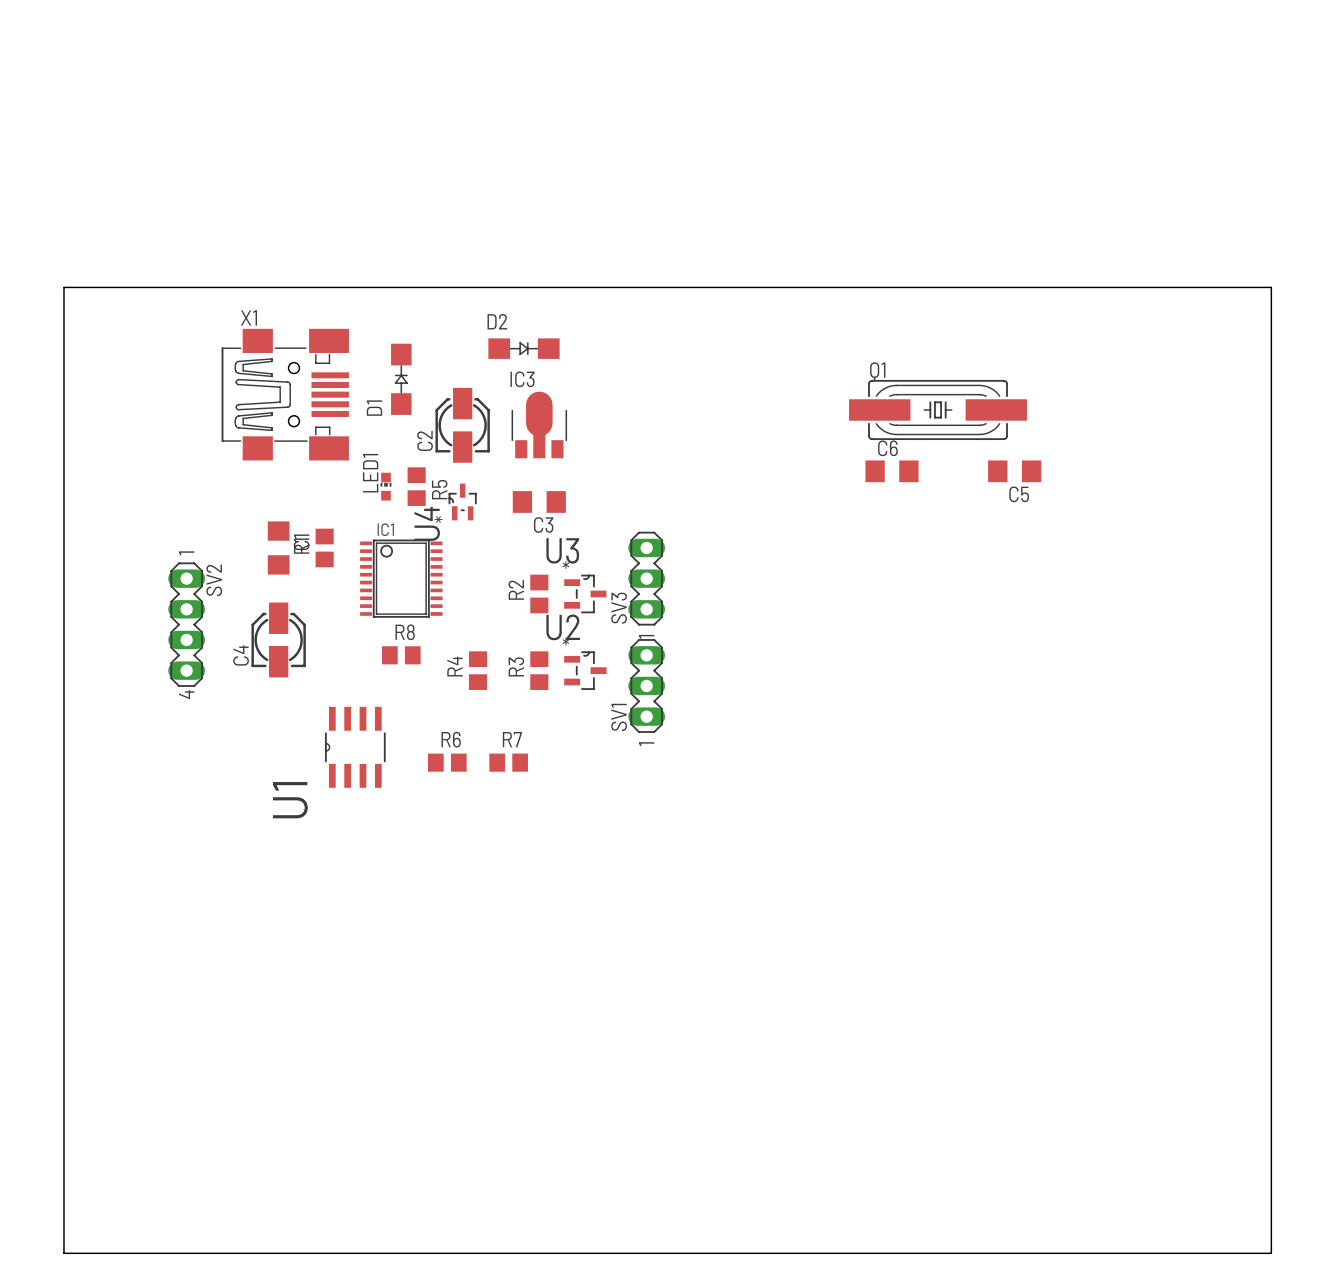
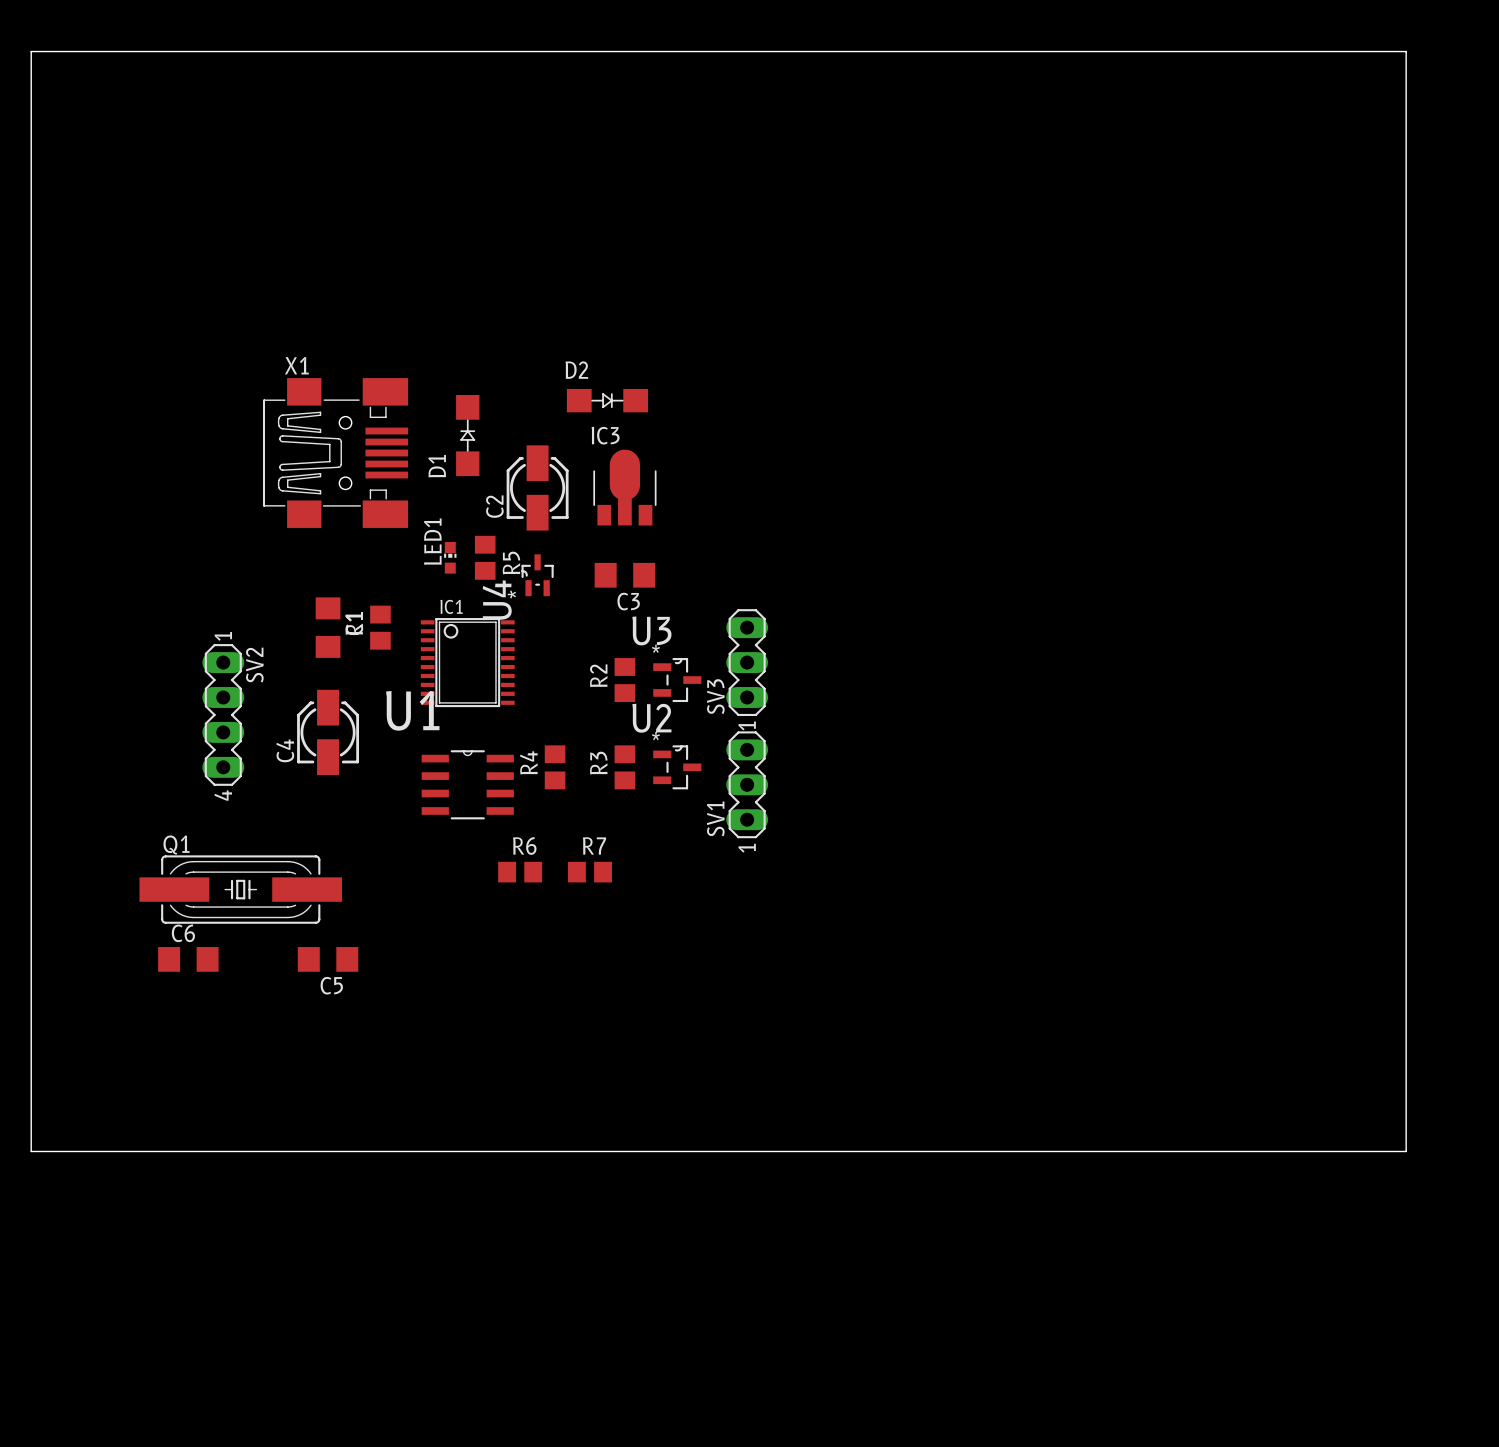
board edge: (63, 287) (1271, 287) (1271, 1253) (63, 1253) (63, 287) -> (31, 51) (31, 1151) (1406, 1151) (1406, 51) (31, 51)
Q1 position: (938, 409) -> (240, 889)
C6 position: (892, 471) -> (188, 959)
C5 position: (1014, 471) -> (328, 959)
R8: (401, 655) -> none
U1 rotation: 0° (355, 747) -> 90° clockwise (467, 784)
U1 position: (355, 747) -> (467, 784)

